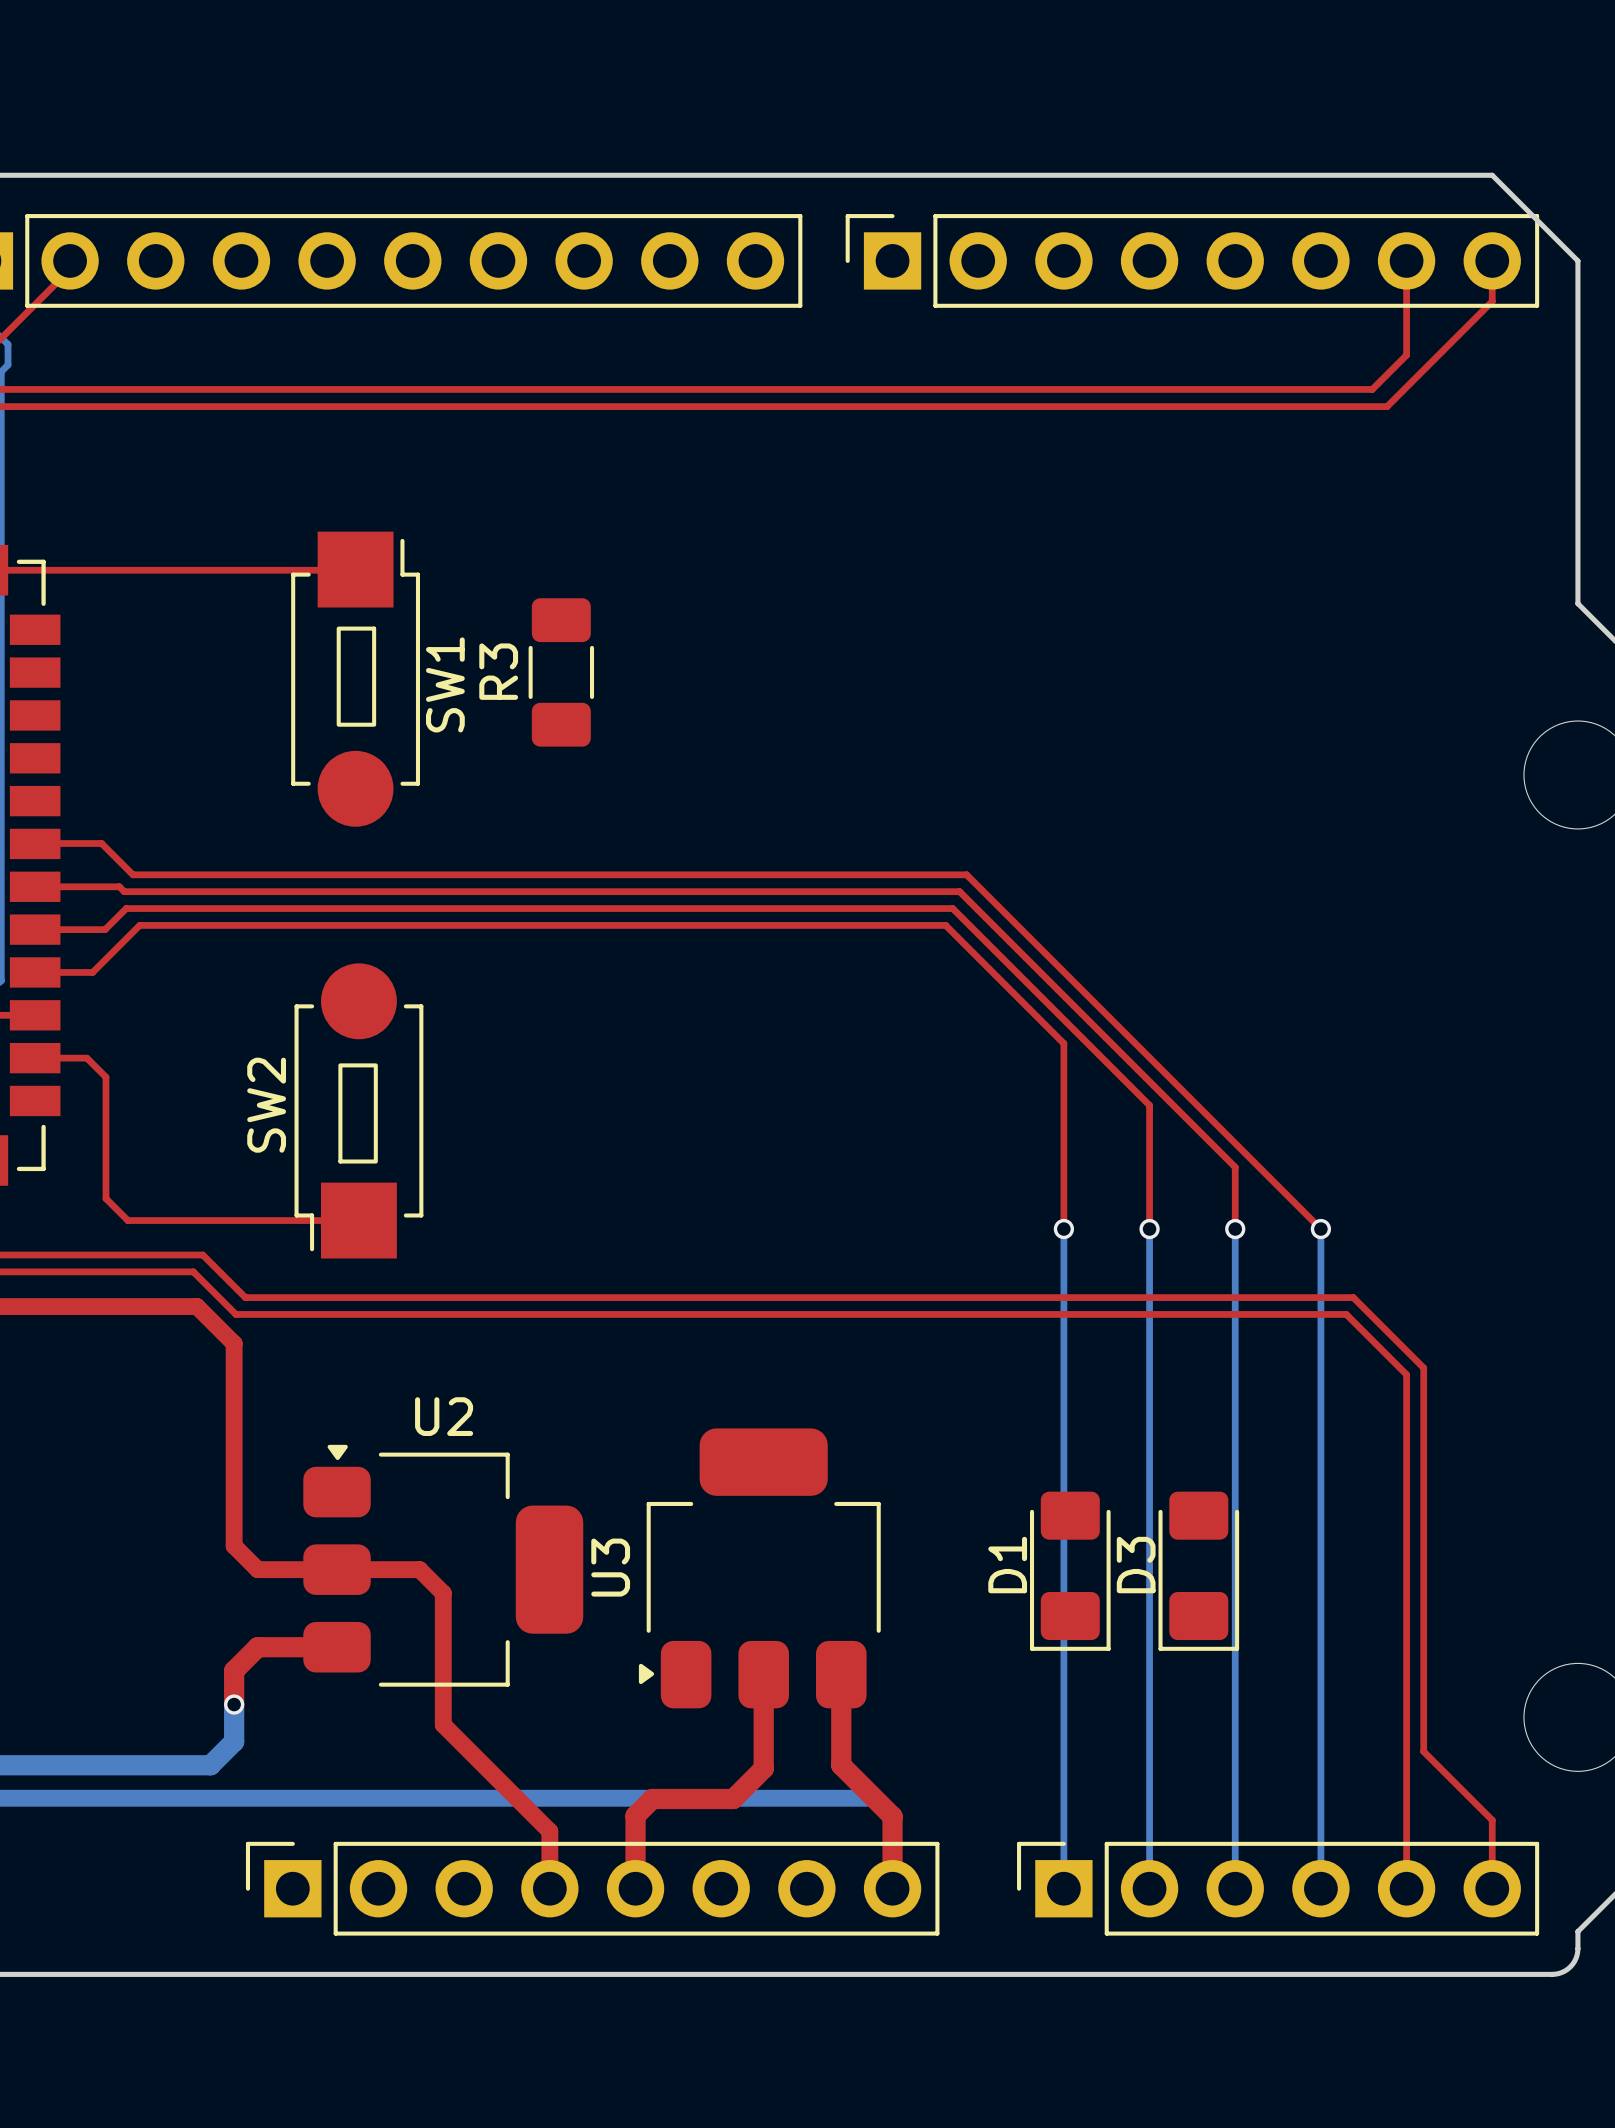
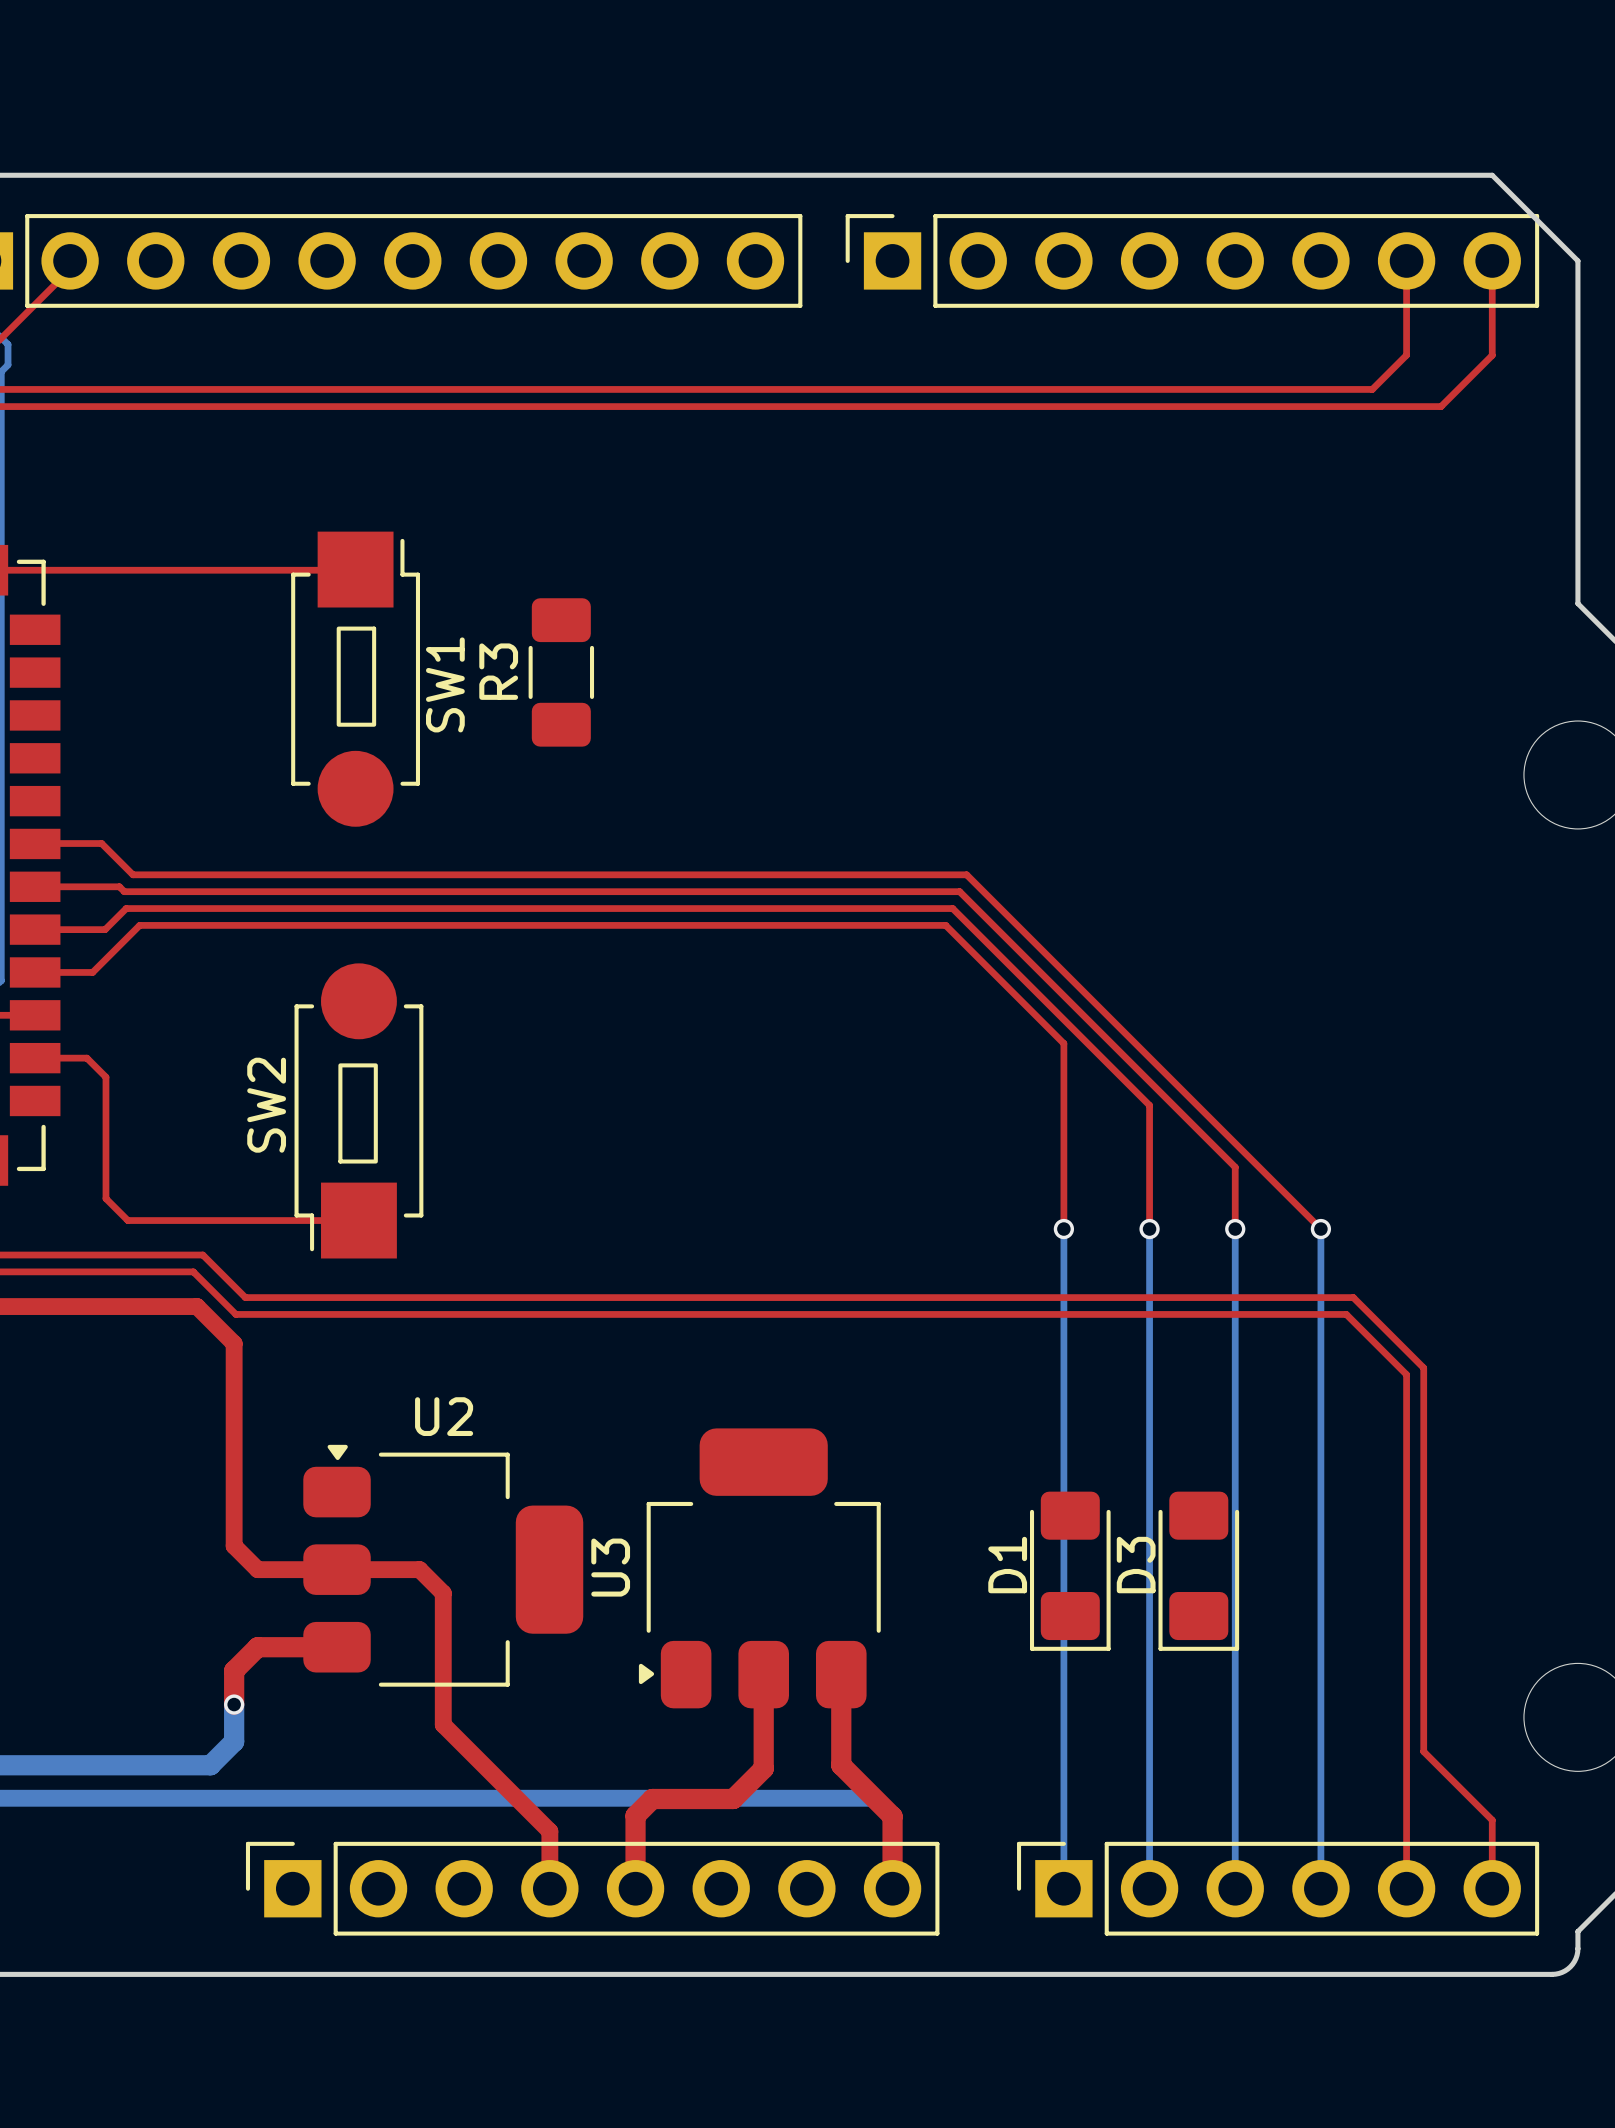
top track: (1492, 301) (1387, 406) -> (1492, 301) (1492, 355) (1441, 406) (1387, 406)

